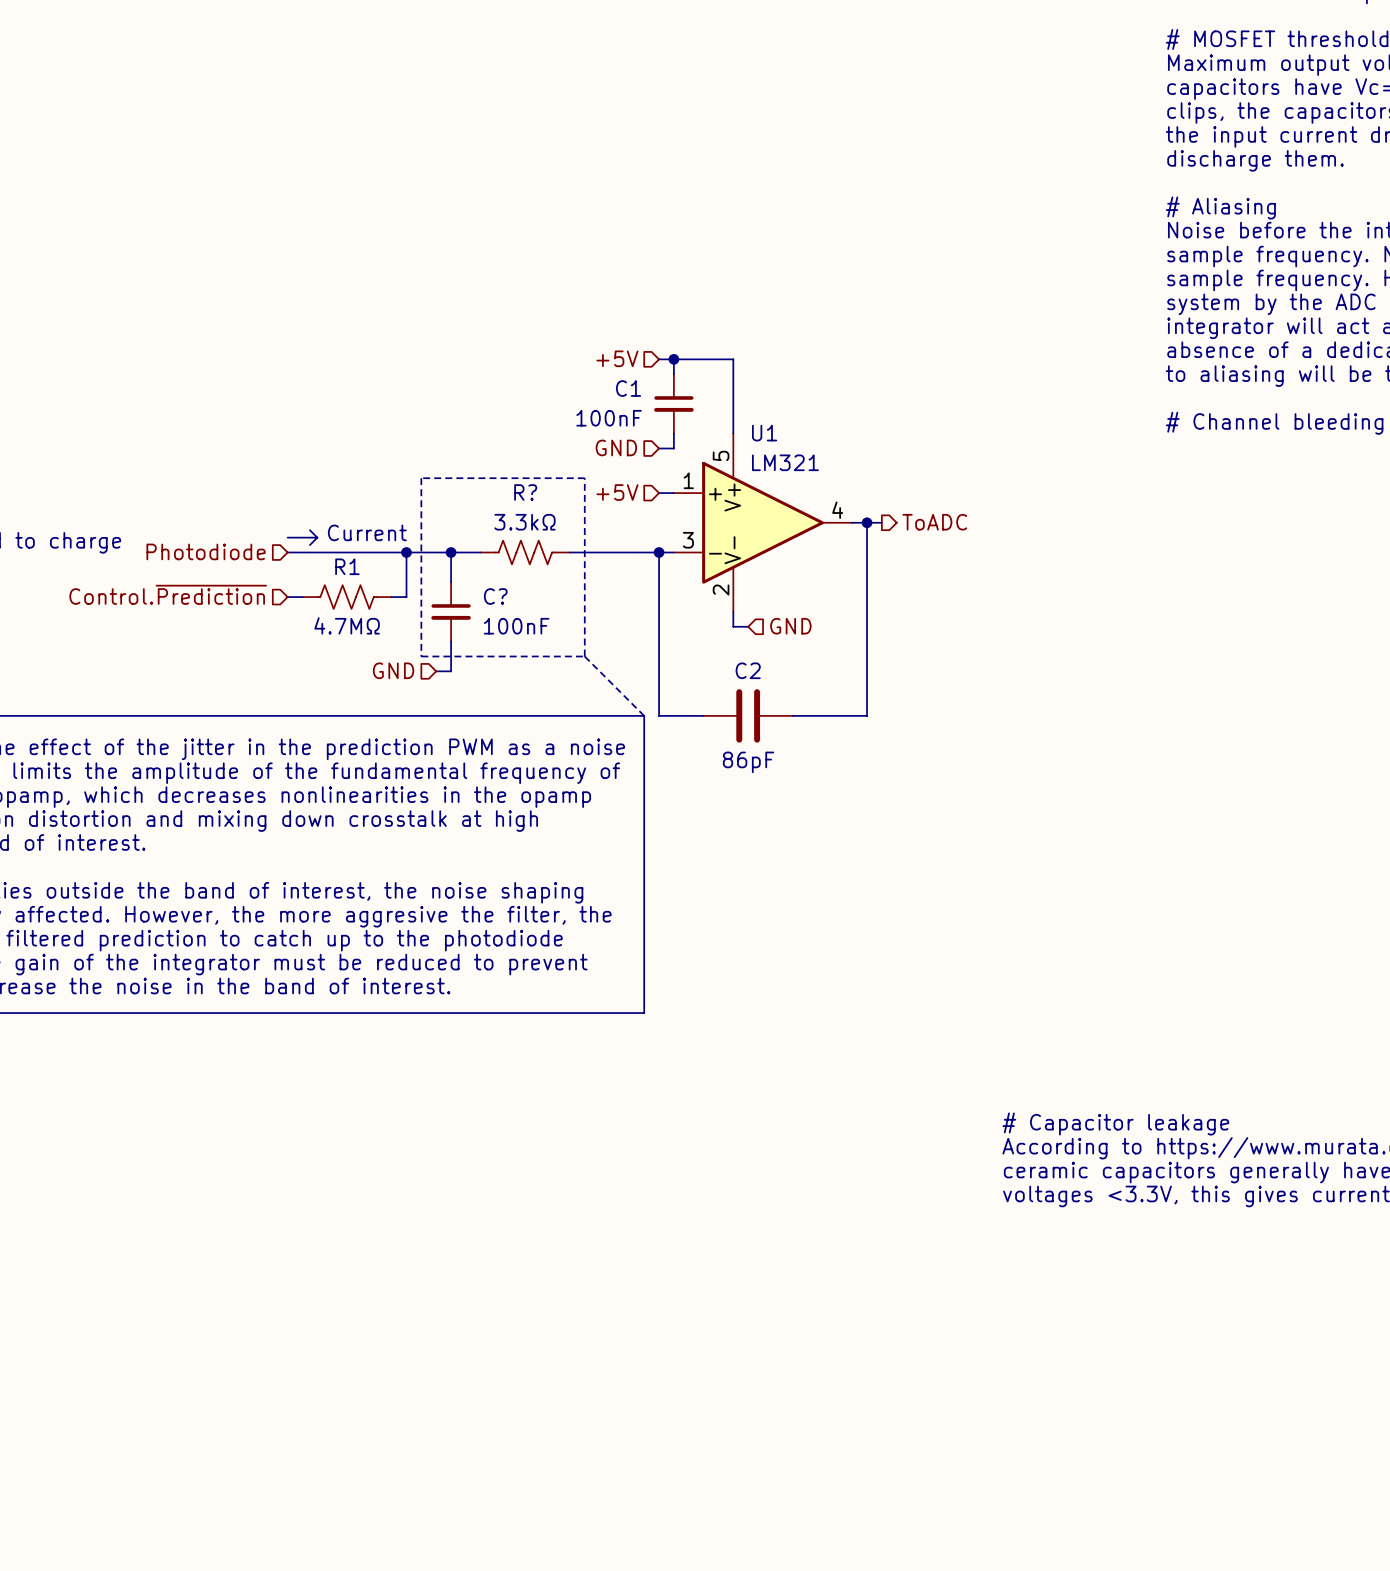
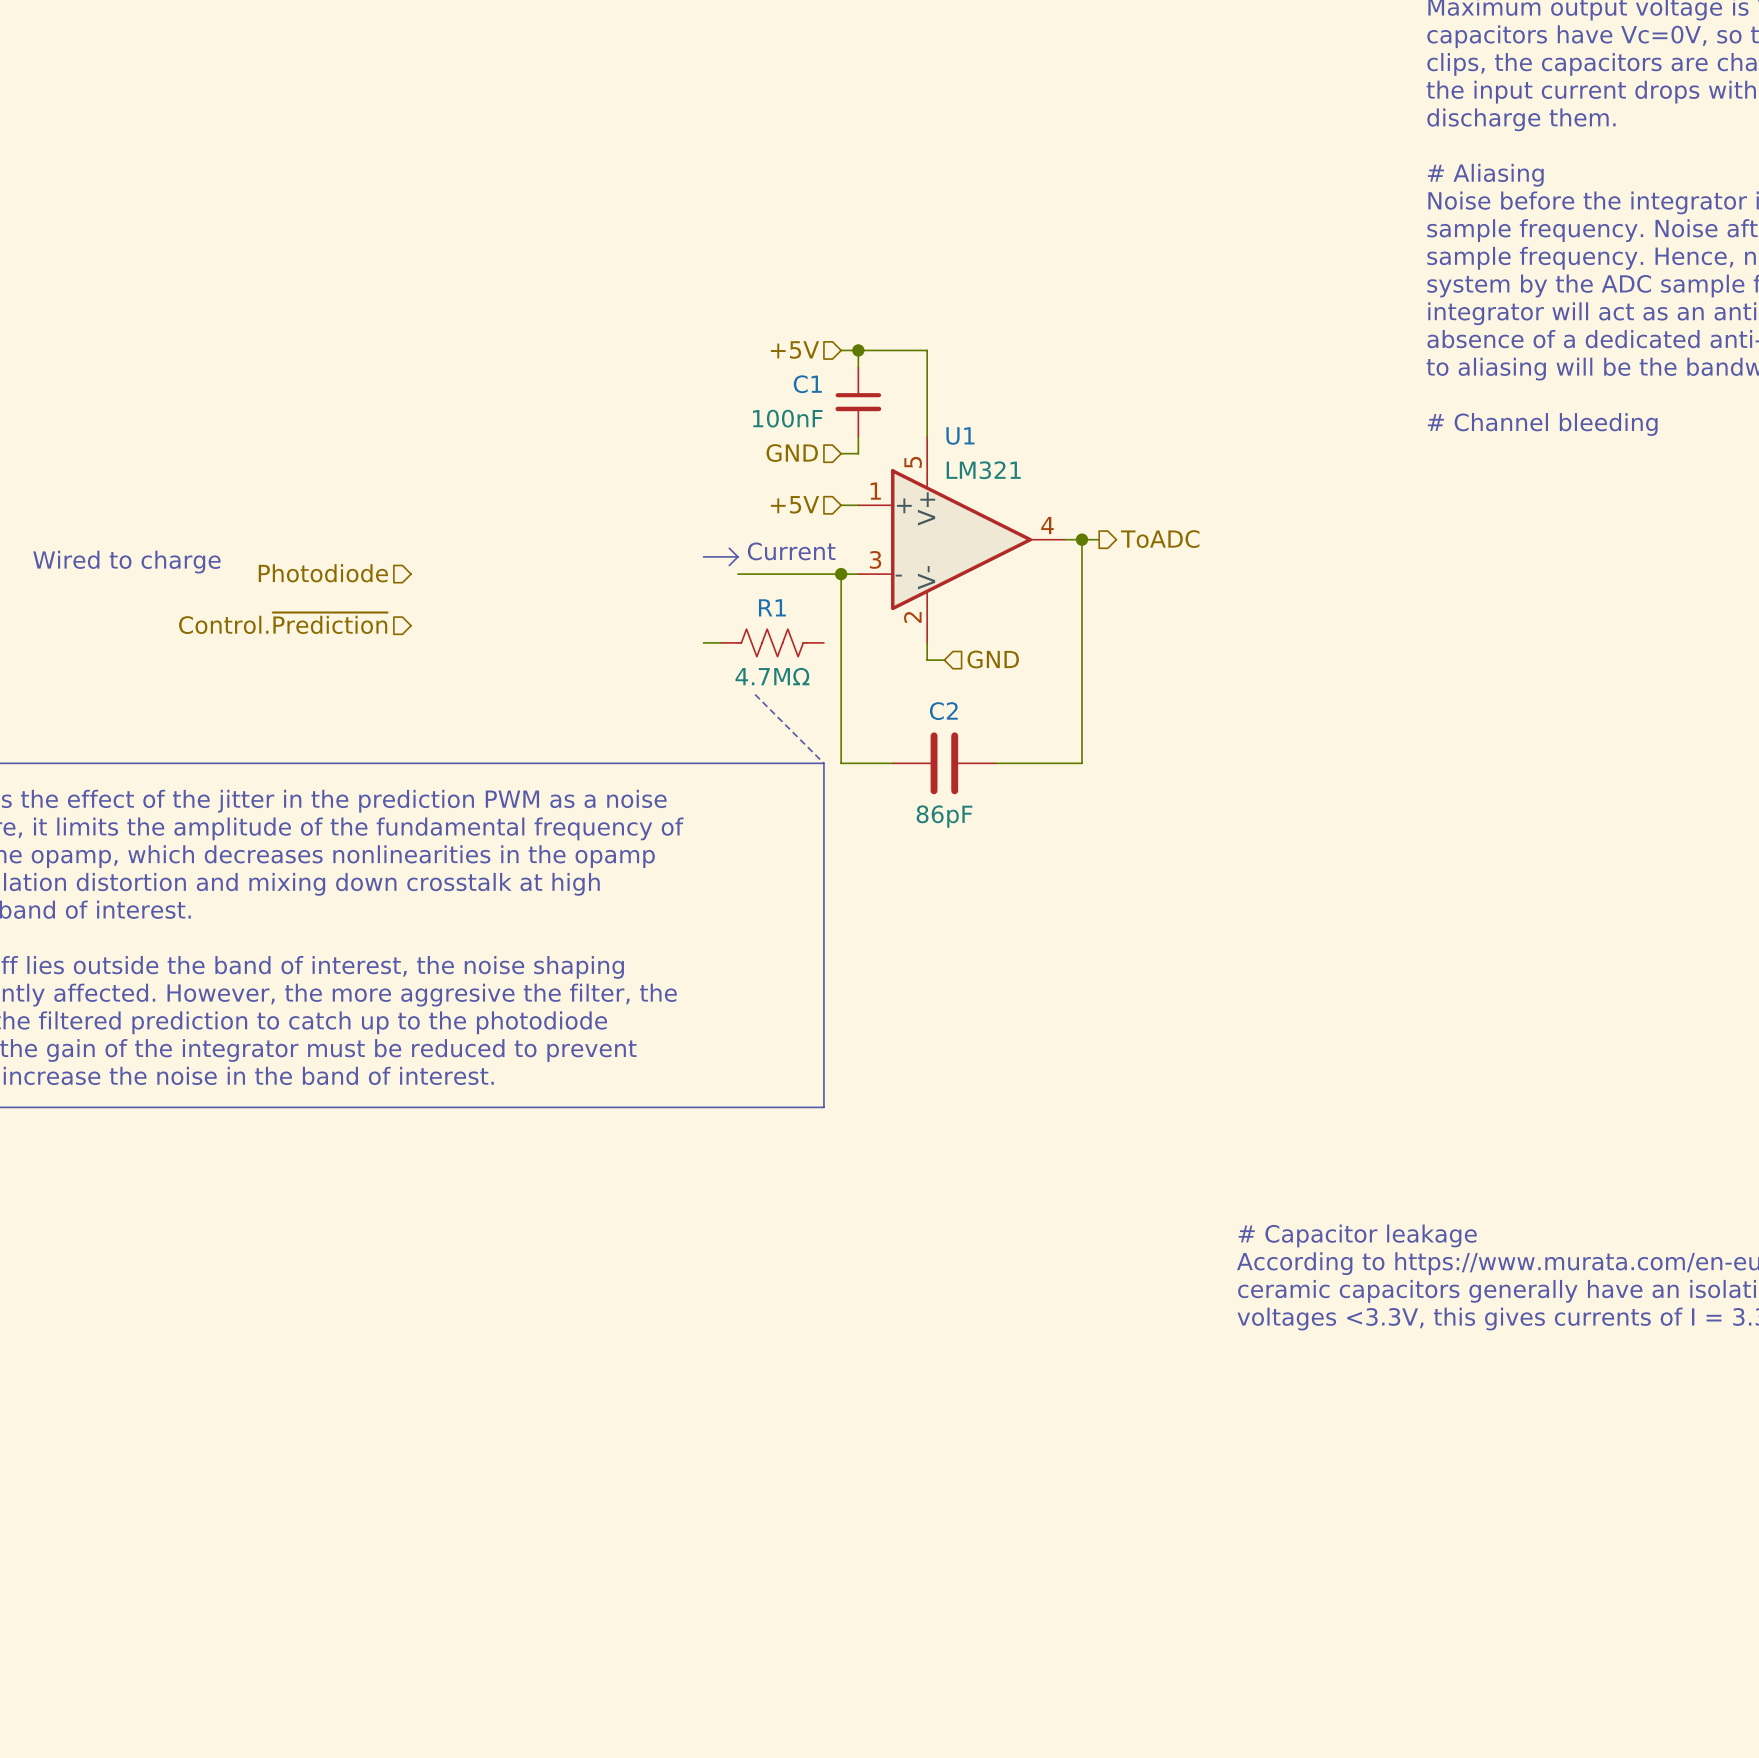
line: (421, 478) (421, 656) (584, 656) (584, 478) (421, 478) -> none
bus: (309, 530) (317, 537) -> (729, 548) (737, 556)
text position: Current (367, 532) -> Current (791, 551)
bus: (287, 537) (317, 537) -> (703, 556) (737, 556)
bus: (317, 537) (309, 545) -> (737, 556) (729, 565)
wire: (287, 552) (480, 552) -> none
wire: (406, 552) (406, 597) (391, 597) -> none
junction: (406, 552) -> none
wire: (451, 552) (451, 582) -> none
junction: (451, 552) -> none
R?: 3.3kΩ (525, 552) -> none
wire: (287, 597) (302, 597) -> (703, 642) (720, 642)
R1 position: (347, 597) -> (772, 642)
C?: 100nF (451, 611) -> none
wire: (451, 641) (451, 671) (436, 671) -> none
hierarchical label: GND (393, 670) -> none

